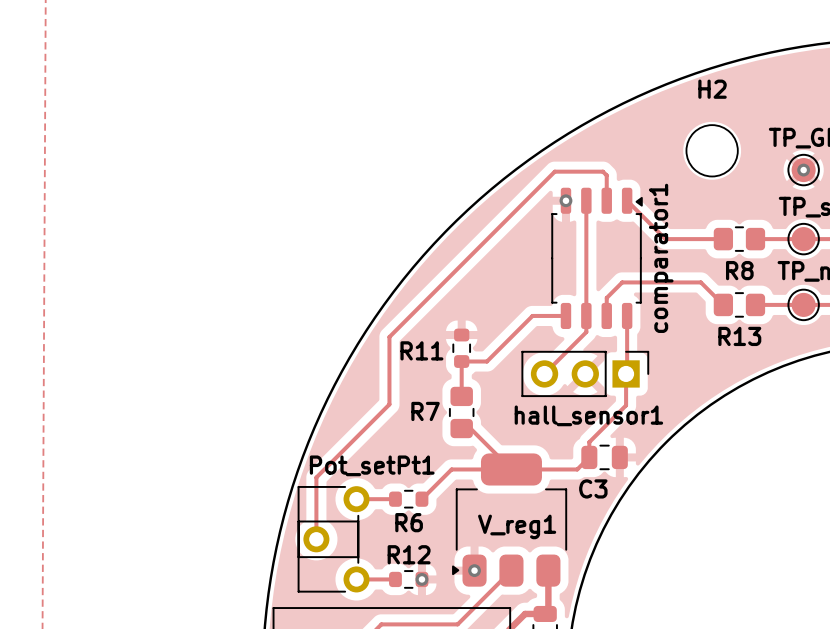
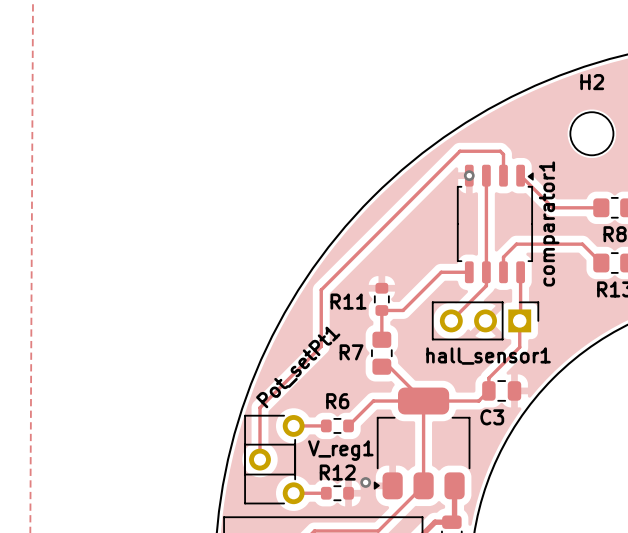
Pot_setPt1 name rotation: 0° (372, 465) -> 45° counterclockwise (298, 367)
track: none -> (423, 401) (423, 485)
R6 name position: R6 (409, 522) -> R6 (337, 401)
V_reg1 name position: V_reg1 (517, 526) -> V_reg1 (340, 450)
via: none -> (365, 482)
via: (474, 570) -> none
via: (421, 579) -> none

